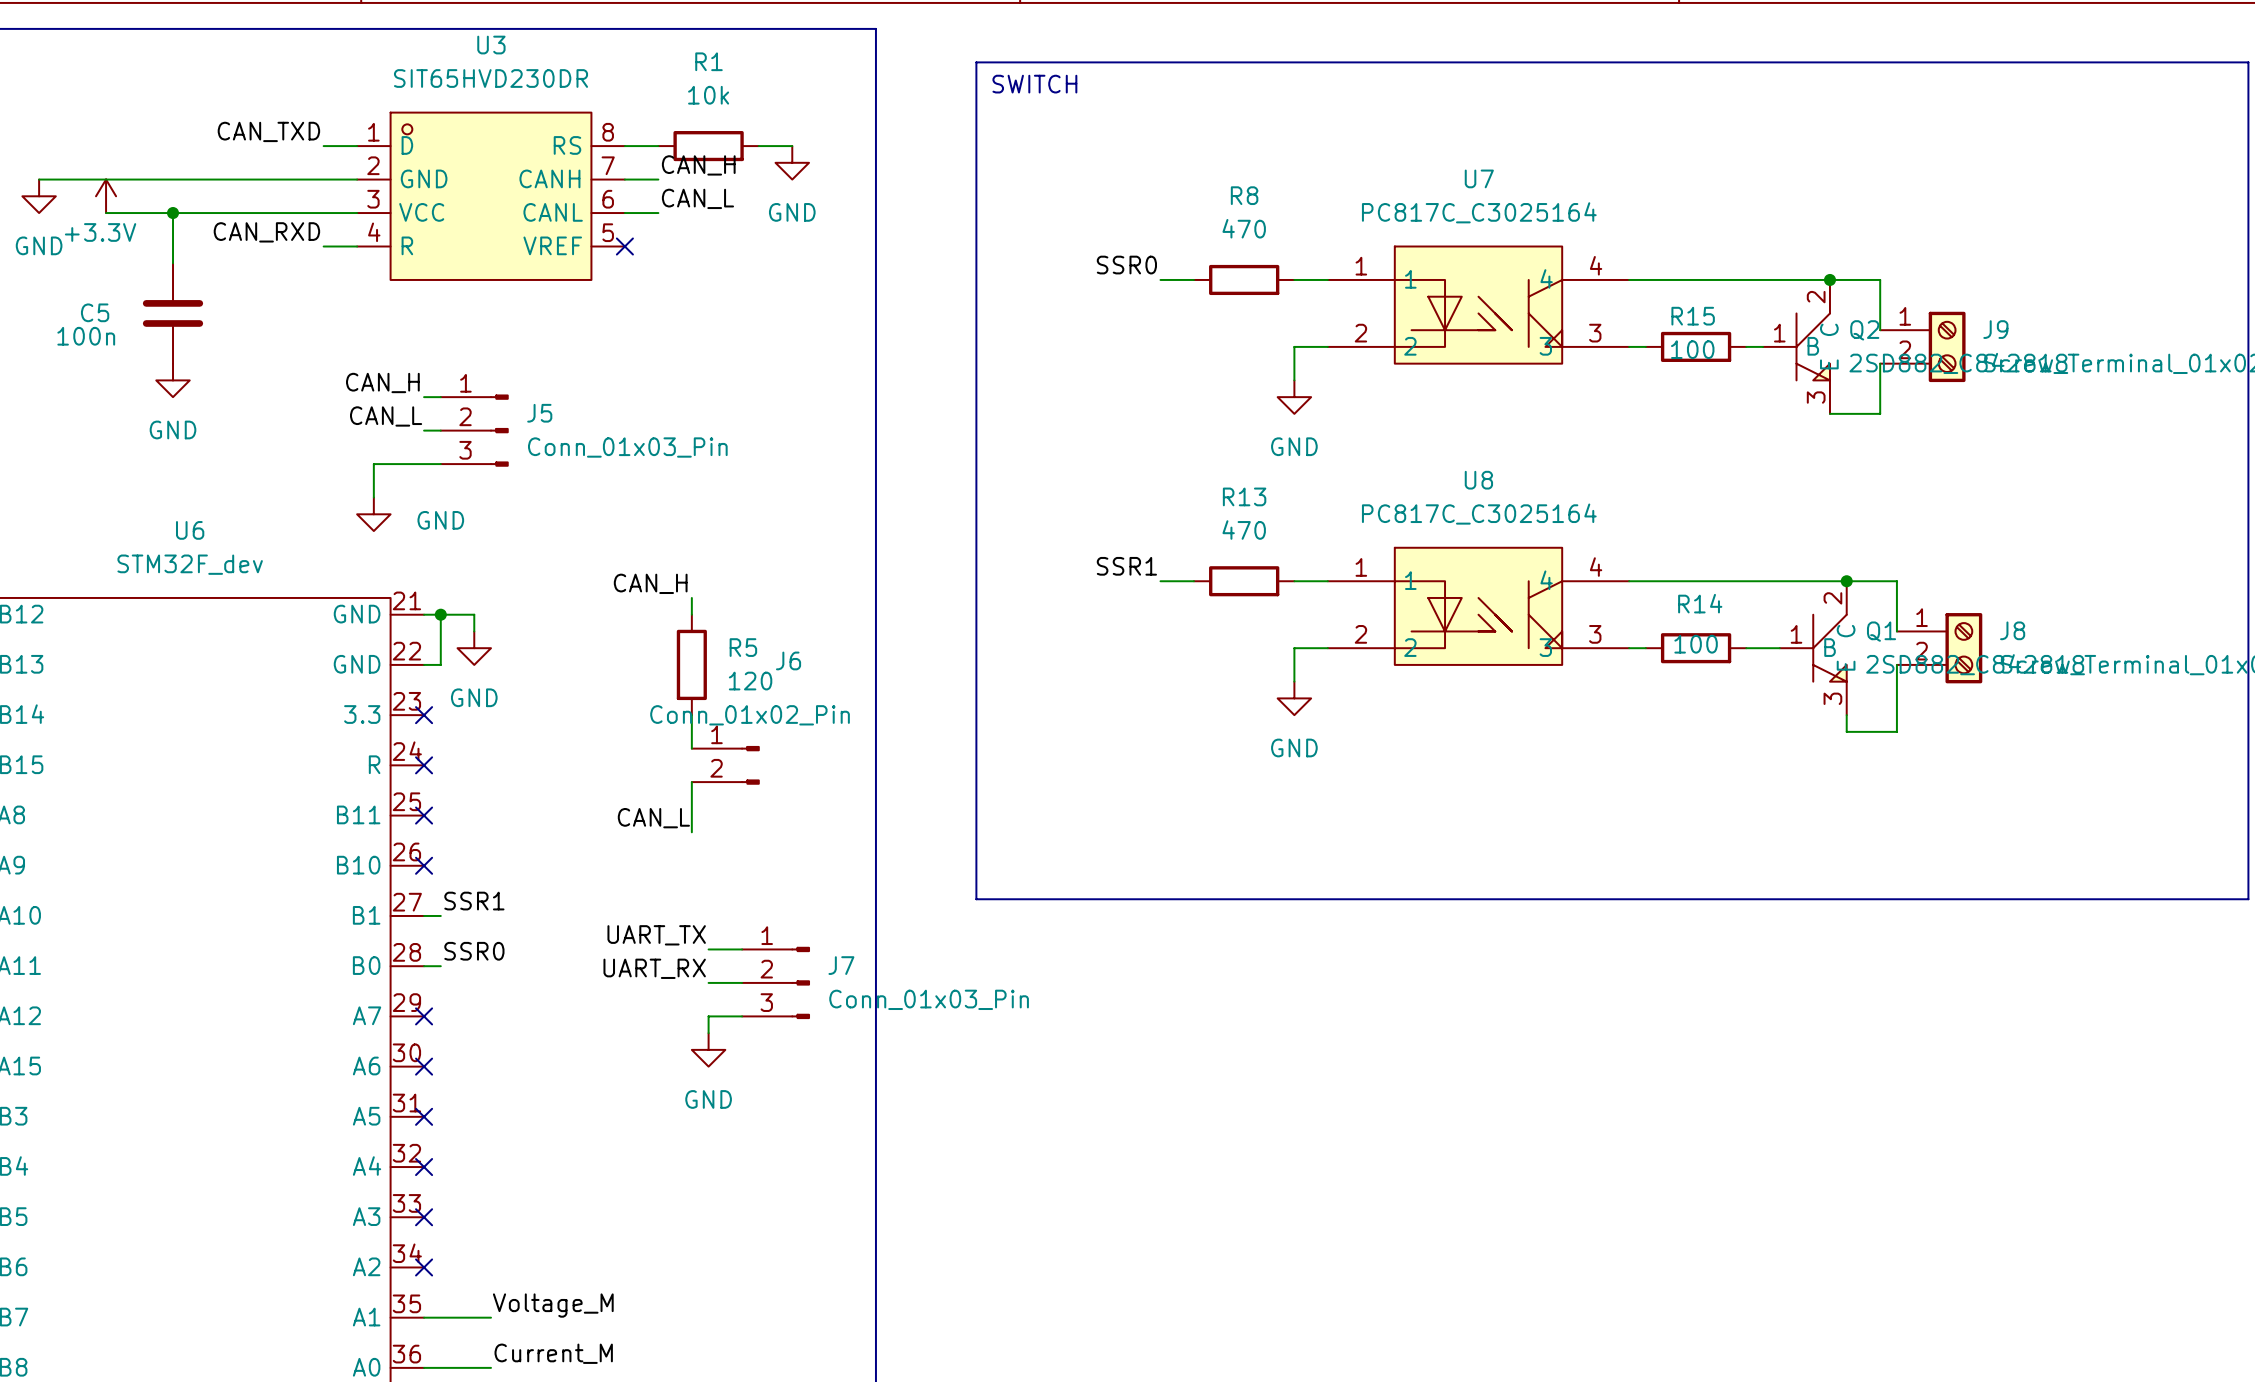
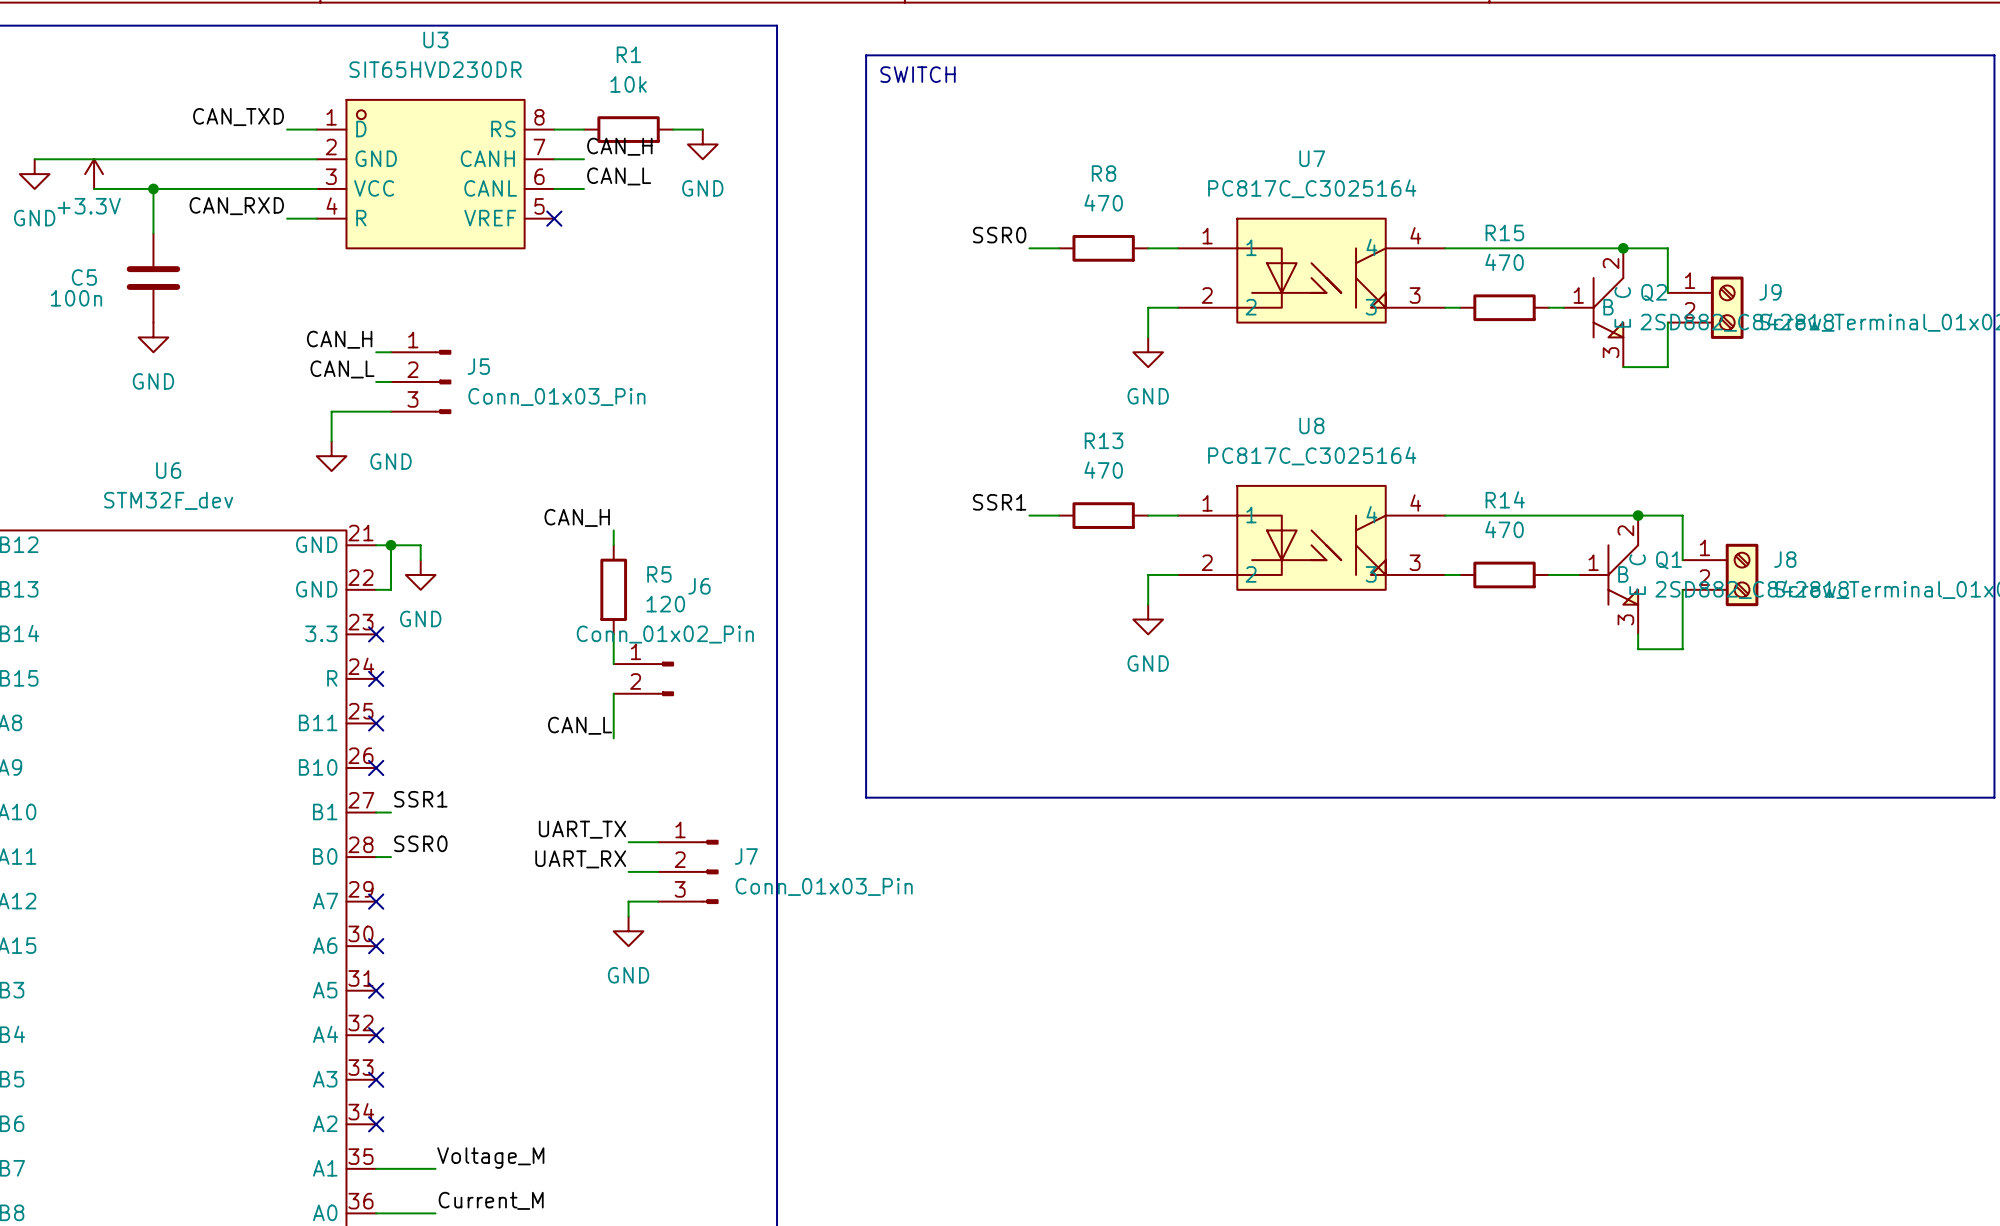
R15 name position: R15 (1693, 316) -> R15 (1504, 232)
R15 value: 100 (1692, 349) -> 470 (1504, 262)
R14 name position: R14 (1700, 603) -> R14 (1505, 499)
R14 value: 100 (1696, 644) -> 470 (1504, 529)

